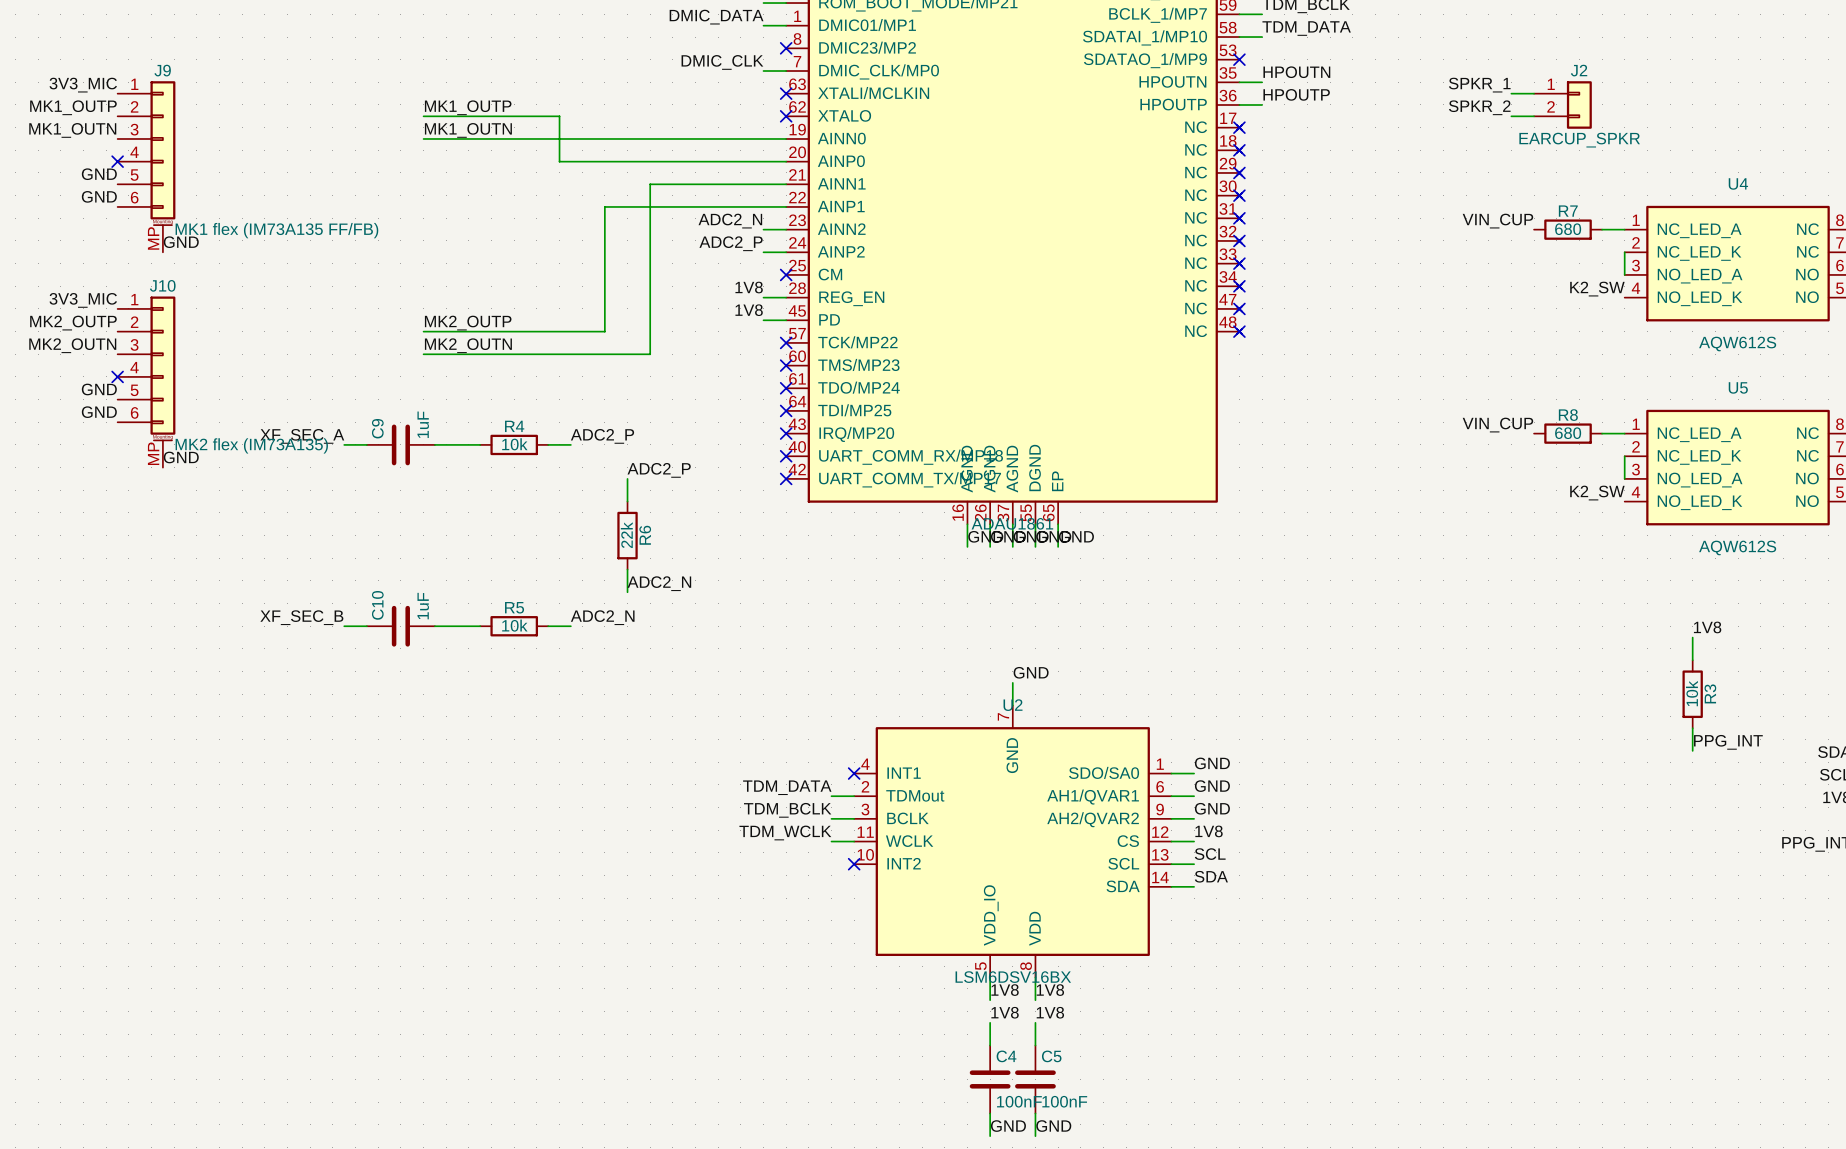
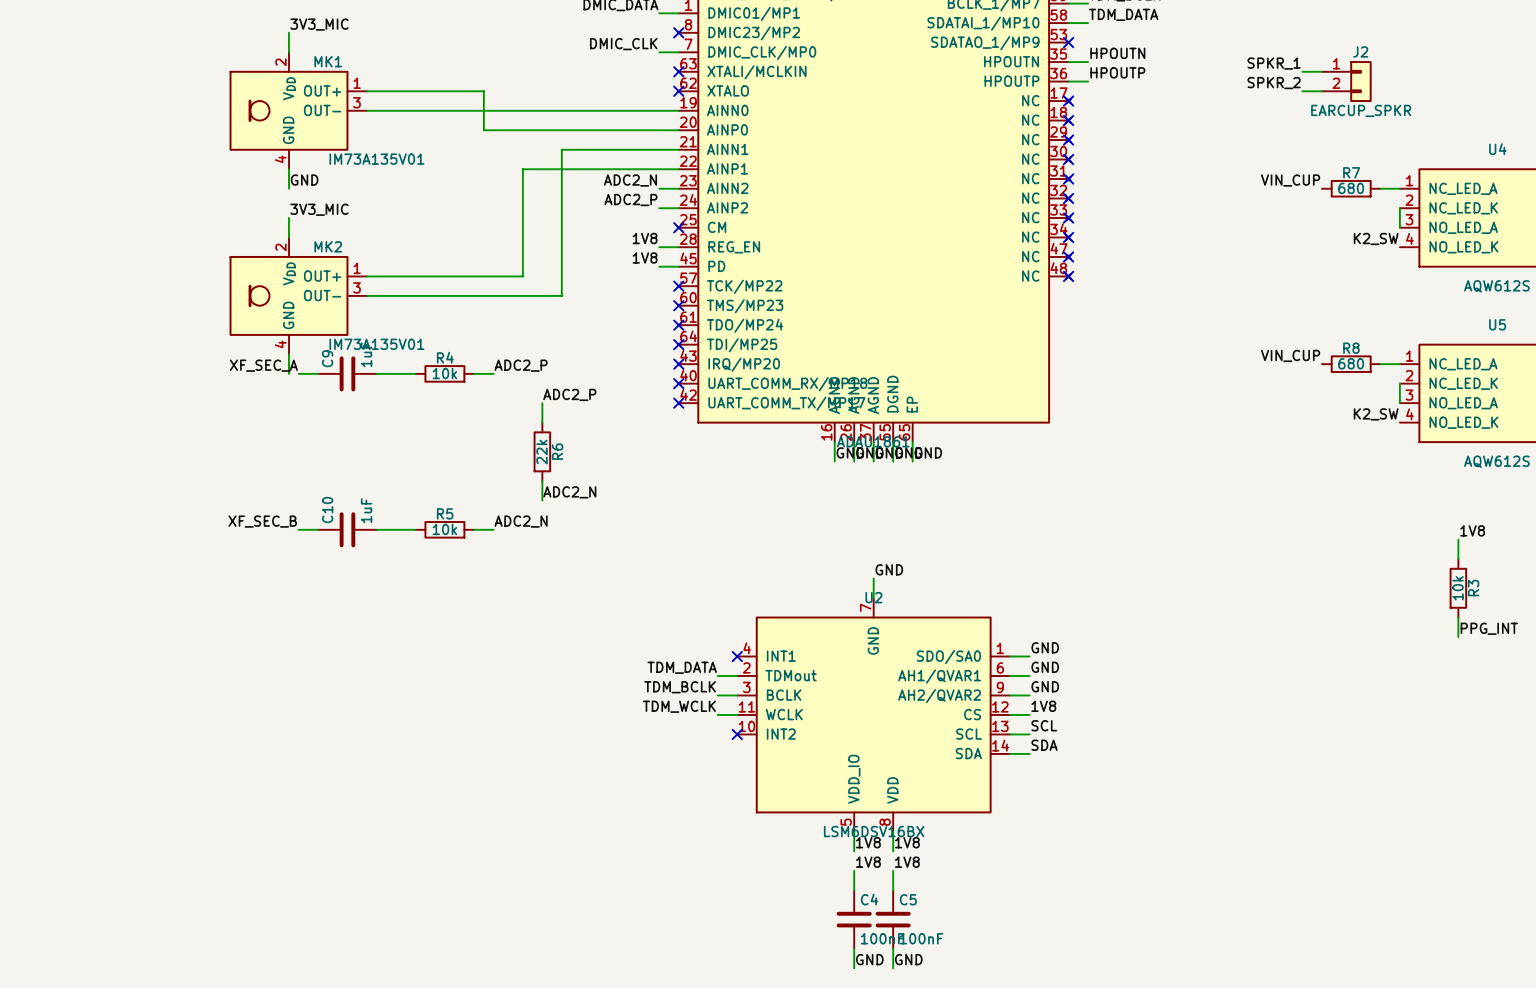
label: none -> 3V3_MIC (319, 24)
wire: none -> (288, 32) (288, 52)
label: 3V3_MIC (83, 85) -> none
label: MK1_OUTP (73, 107) -> none
label: MK1_OUTP (468, 107) -> none
label: MK1_OUTN (72, 130) -> none
label: MK1_OUTN (468, 130) -> none
MK1: none -> IM73A135V01 (298, 110)
no-connect mark: (117, 161) -> none
J9: MK1 flex (IM73A135 FF/FB) (146, 166) -> none
label: GND (99, 174) -> none
label: GND (99, 196) -> none
wire: none -> (288, 169) (288, 188)
label: none -> GND (304, 180)
label: GND (181, 242) -> none
label: none -> 3V3_MIC (319, 209)
wire: none -> (288, 217) (288, 237)
label: 3V3_MIC (83, 300) -> none
label: MK2_OUTP (73, 323) -> none
label: MK2_OUTP (468, 323) -> none
label: MK2_OUTN (72, 345) -> none
label: MK2_OUTN (468, 345) -> none
MK2: none -> IM73A135V01 (298, 295)
no-connect mark: (117, 376) -> none
J10: MK2 flex (IM73A135) (146, 382) -> none
label: GND (99, 389) -> none
label: GND (99, 412) -> none
wire: none -> (288, 354) (288, 373)
label: GND (181, 457) -> none

